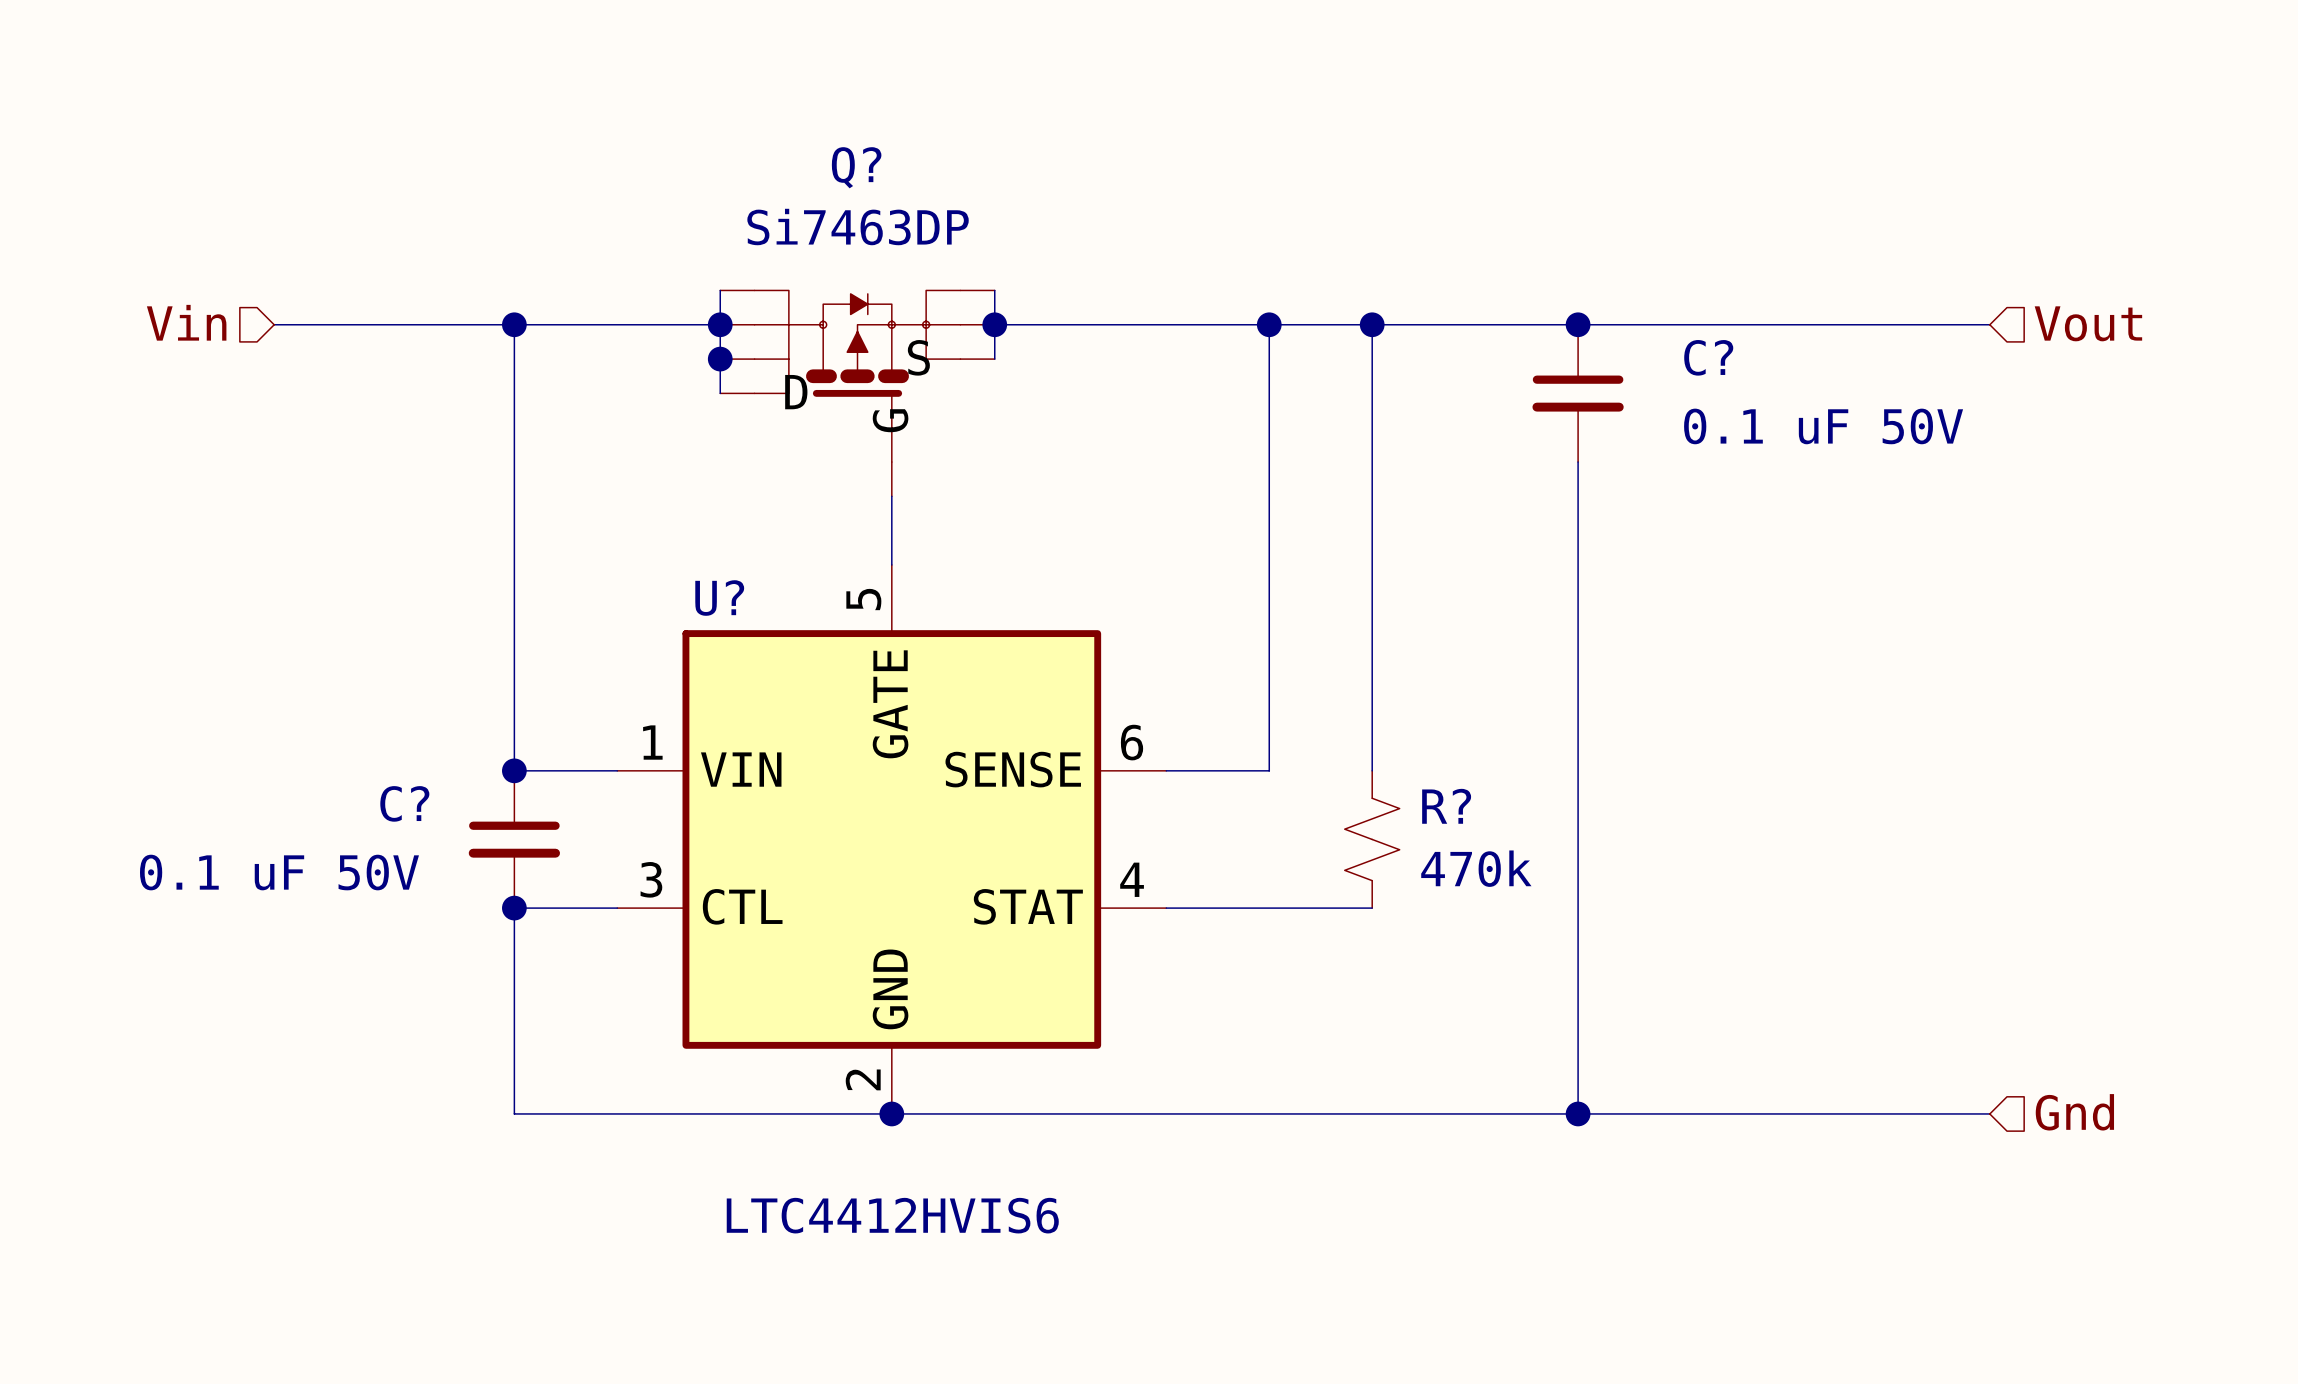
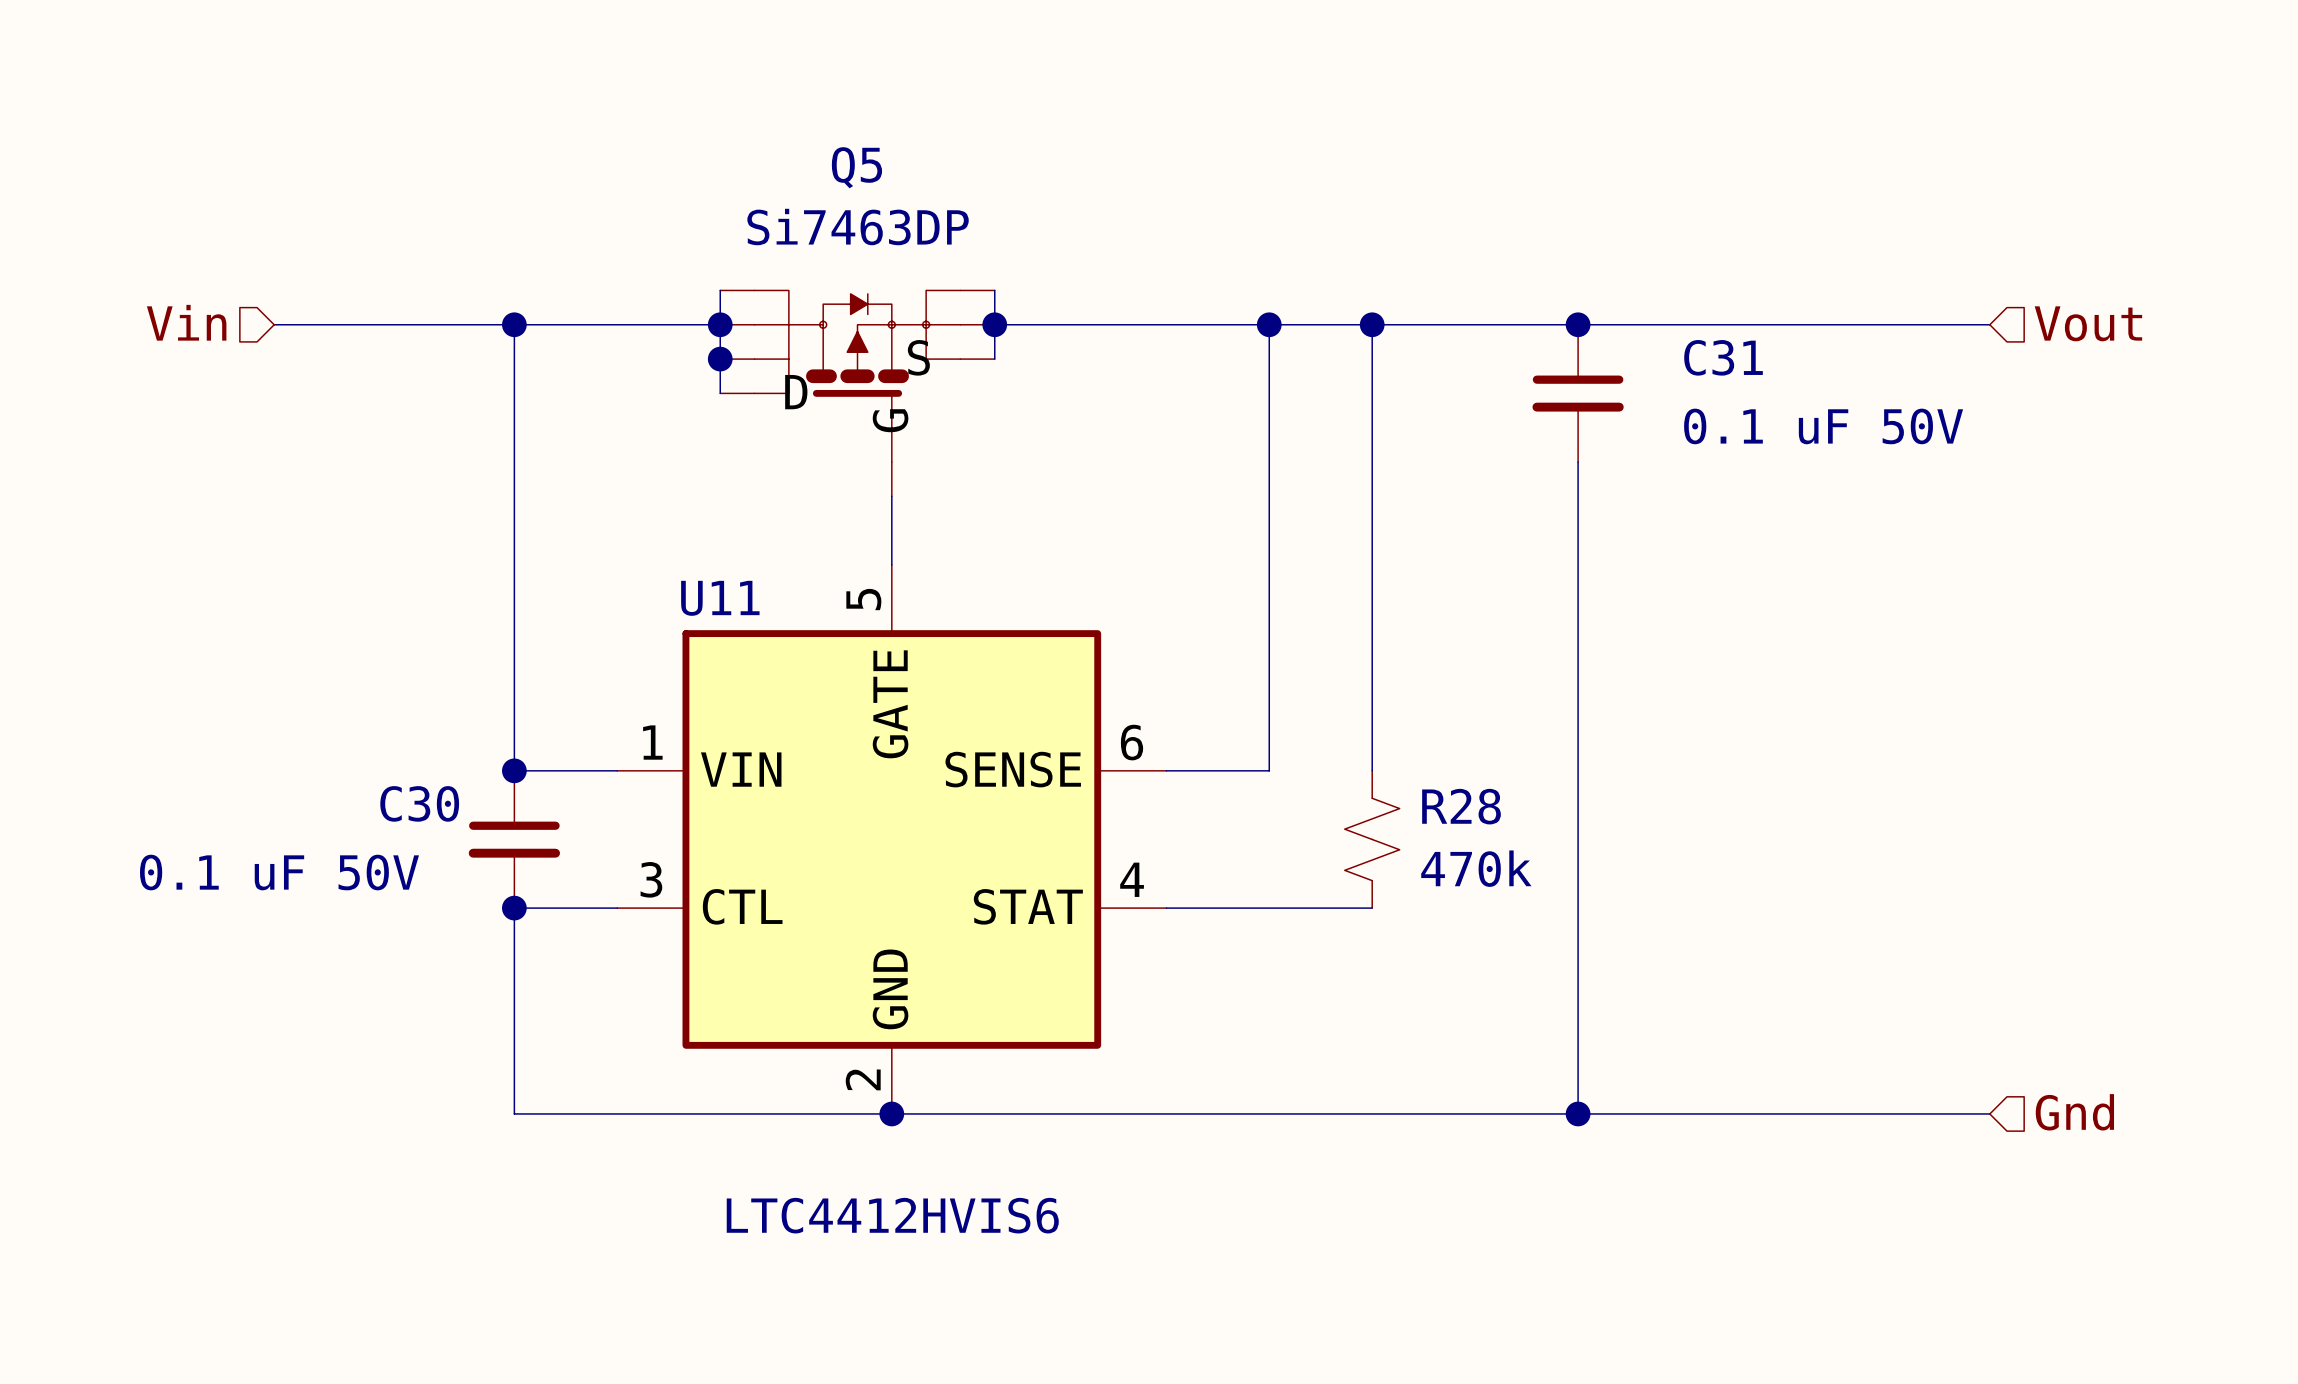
Q? name: Q? (856, 167) -> Q5 (856, 167)
C? name: C? (1708, 357) -> C31 (1723, 357)
U? name: U? (719, 598) -> U11 (720, 598)
C? name: C? (404, 803) -> C30 (419, 803)
R? name: R? (1446, 806) -> R28 (1461, 806)

